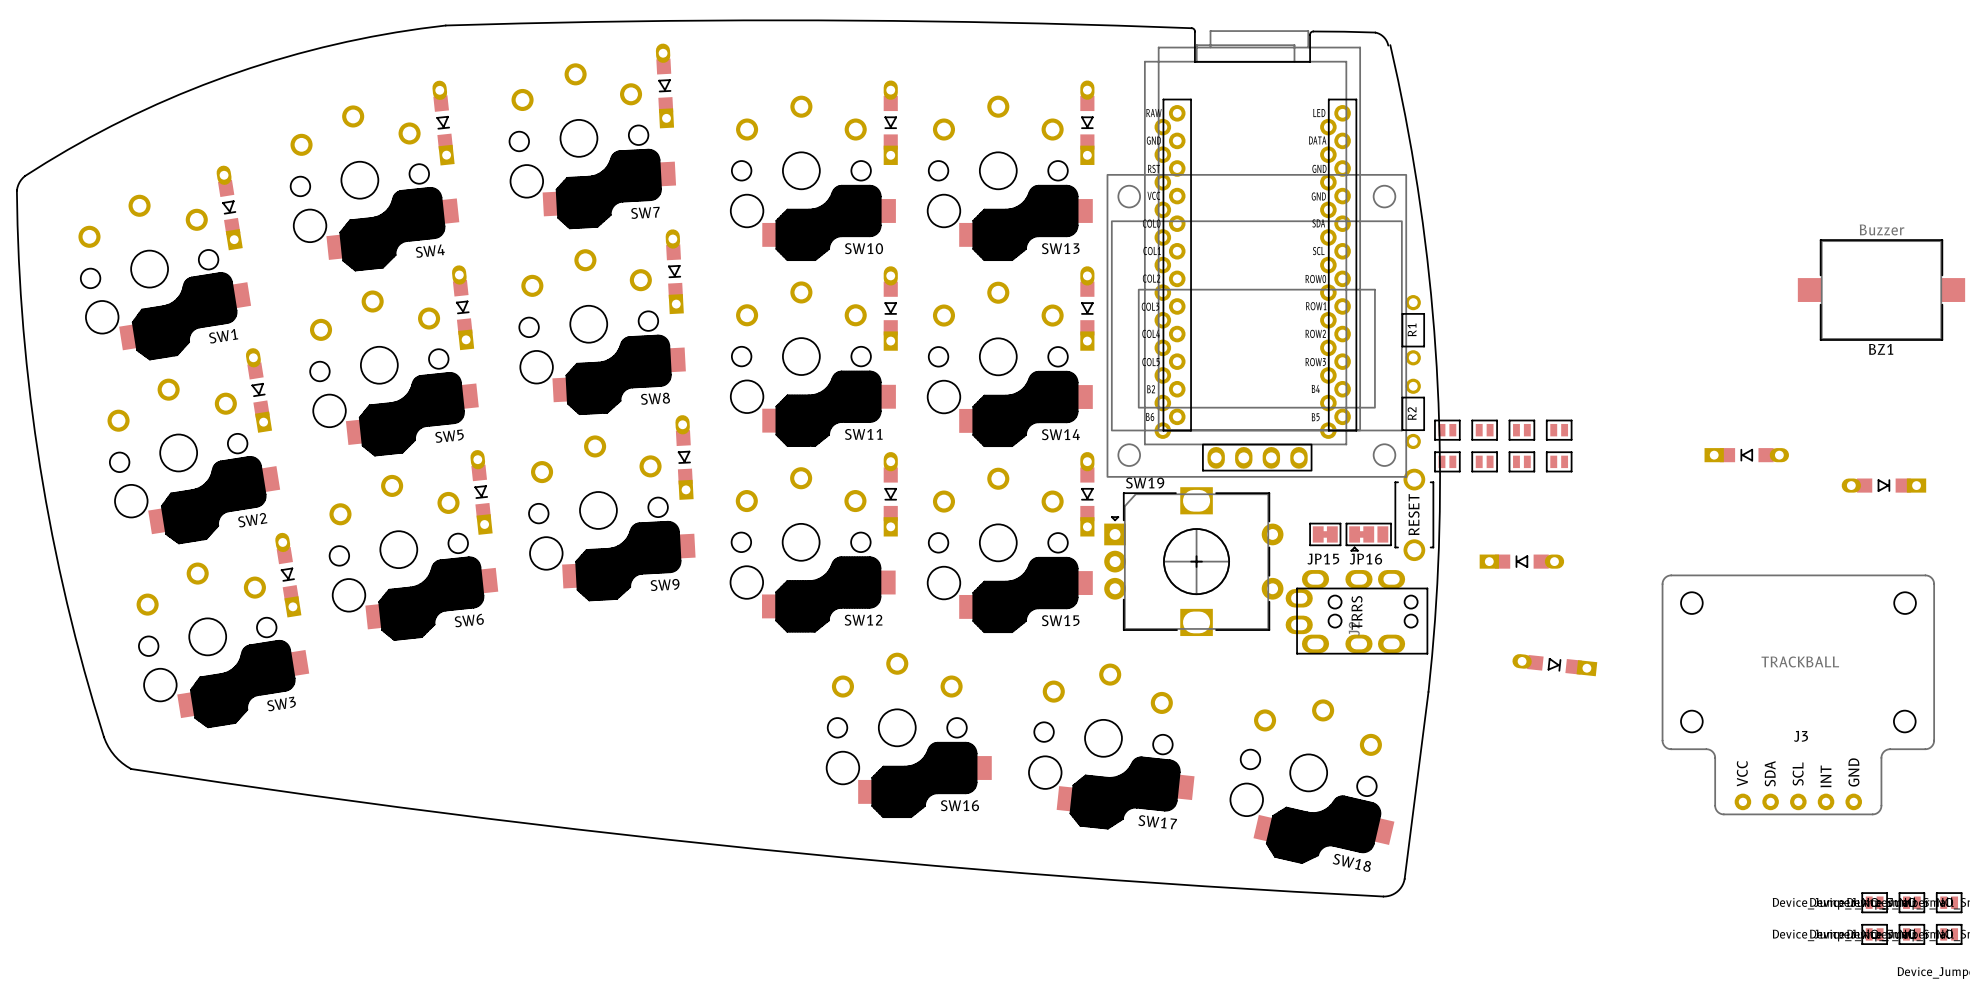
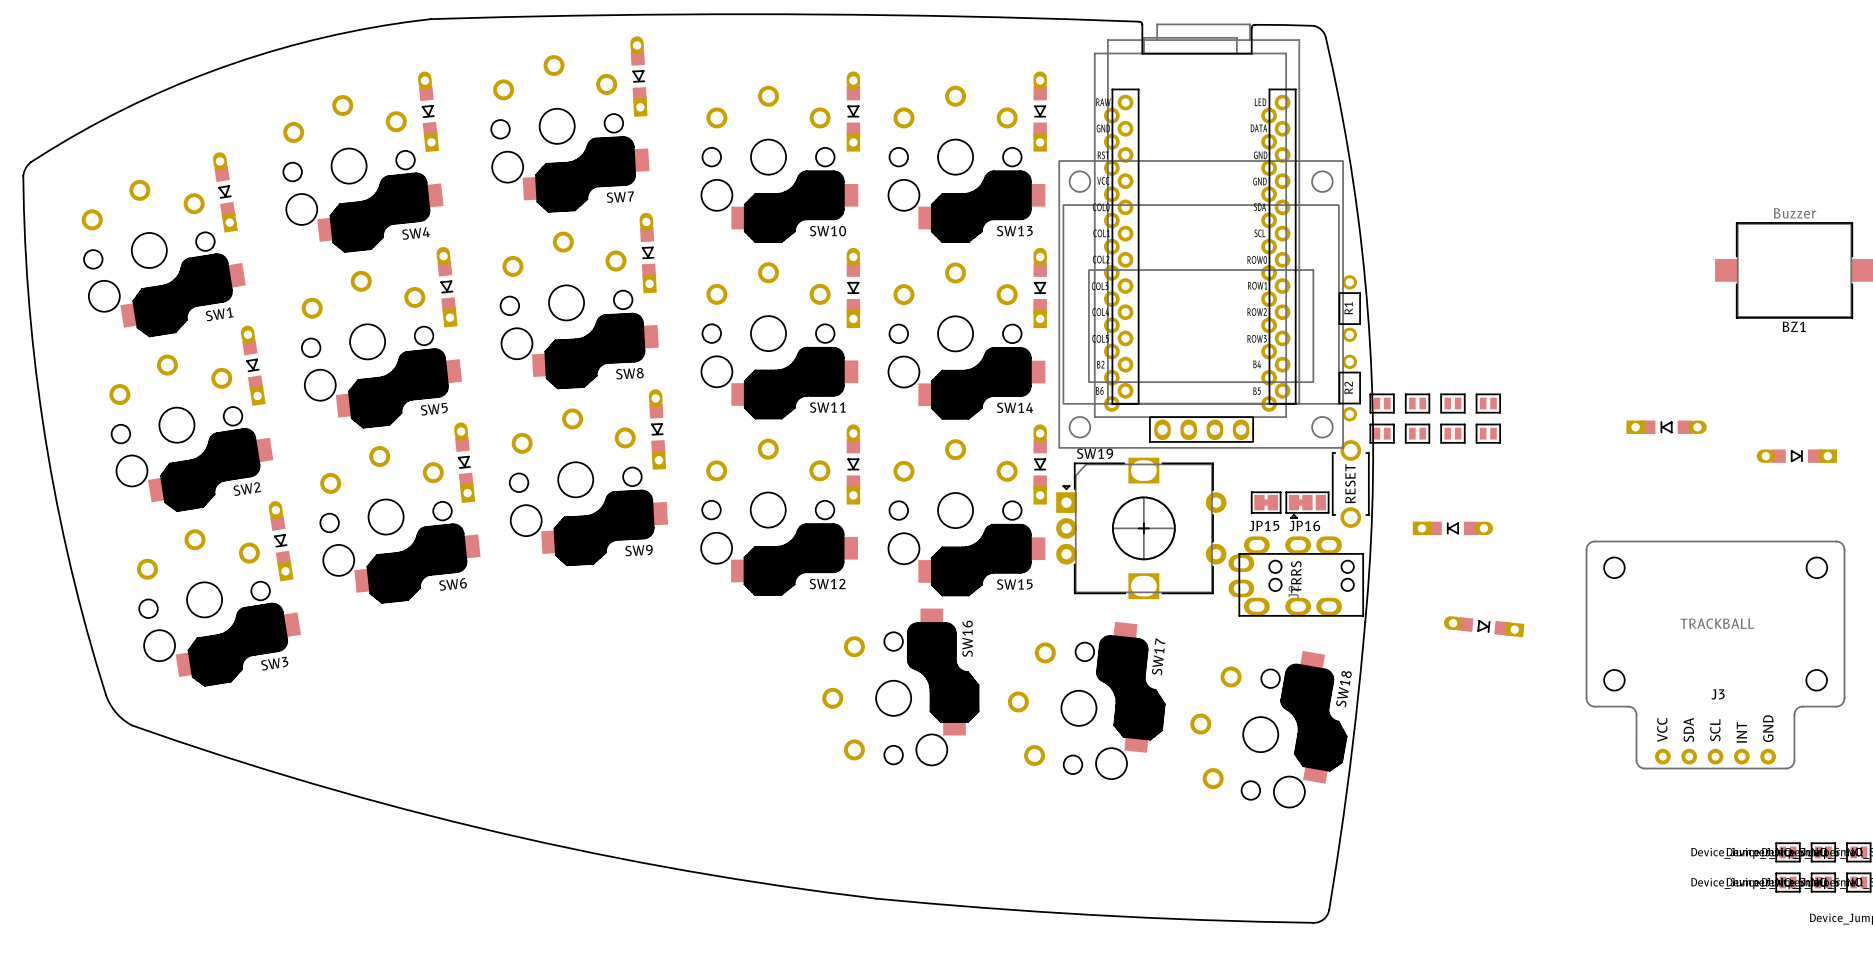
board edge: (1390, 45) (1411, 151) (1427, 258) (1436, 366) (1440, 475) (1437, 583) (1428, 691) (1404, 879) (1402, 886) (1395, 893) (1383, 896) (1114, 880) (755, 848) (487, 818) (131, 768) -> (1326, 38) (1345, 134) (1359, 231) (1370, 361) (1373, 459) (1367, 589) (1355, 718) (1329, 909) (1322, 920) (1313, 922) (1203, 920) (985, 907) (876, 898) (733, 878) (592, 853) (452, 821) (268, 770) (131, 725)
SW18 footprint: [1230, 699, 1395, 864] -> [1190, 650, 1348, 808]
SW16 rotation: 0° (909, 735) -> 90° counterclockwise (900, 686)
SW17 rotation: 0° (1111, 746) -> 90° counterclockwise (1086, 700)
SW18 name position: SW18 (1351, 862) -> SW18 (1343, 689)

